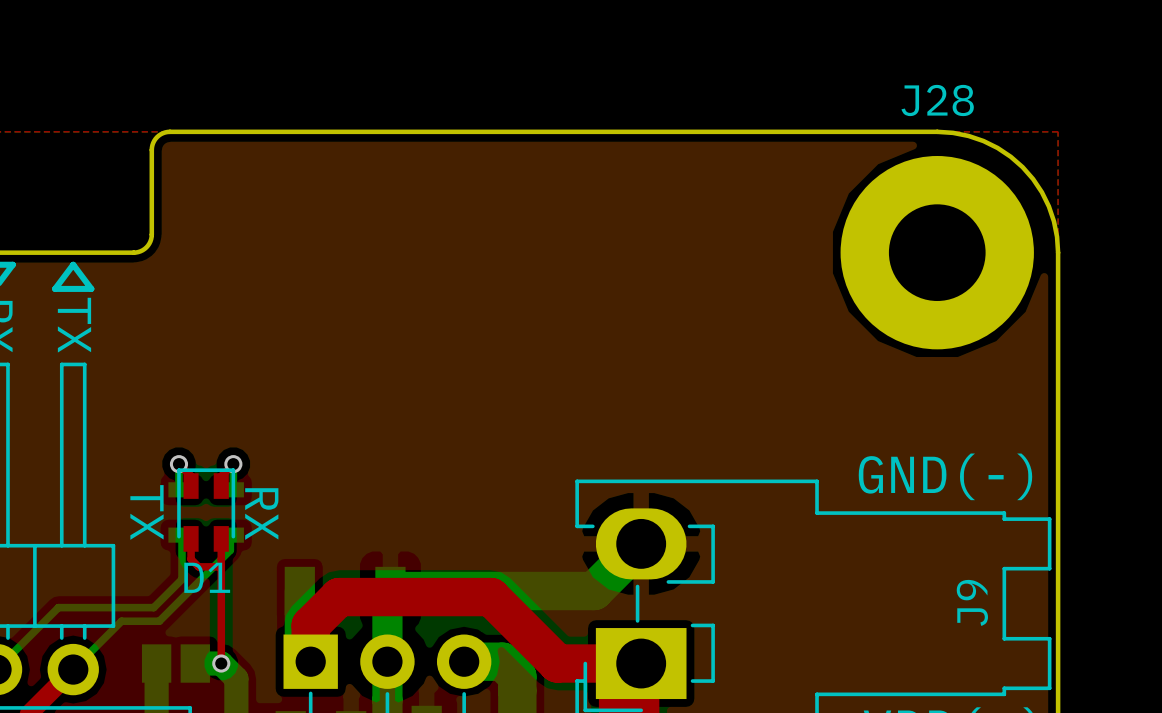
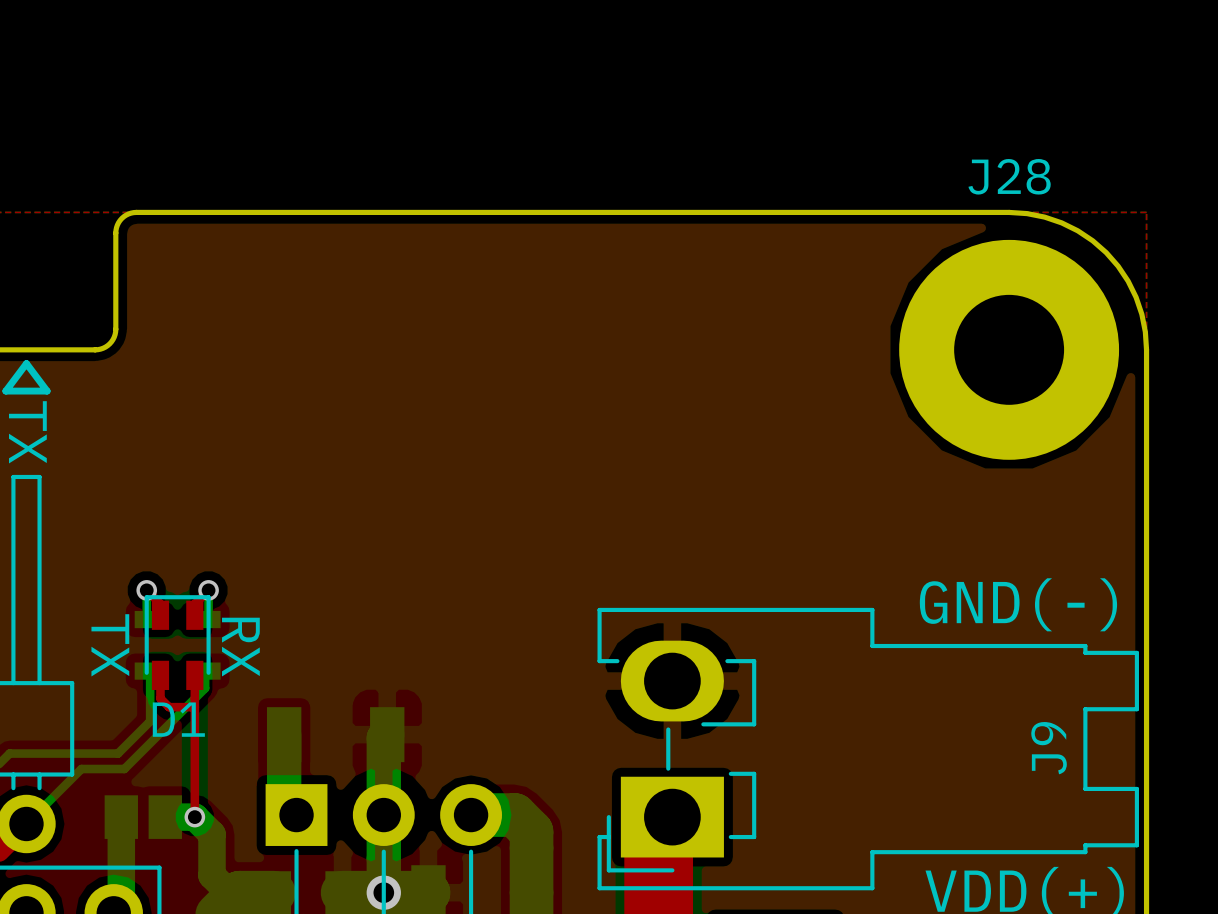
bottom track: (641, 543) (594, 591) (390, 591) -> none
top track: (310, 661) (310, 625) (339, 597) (491, 597) (557, 663) (641, 663) -> none

